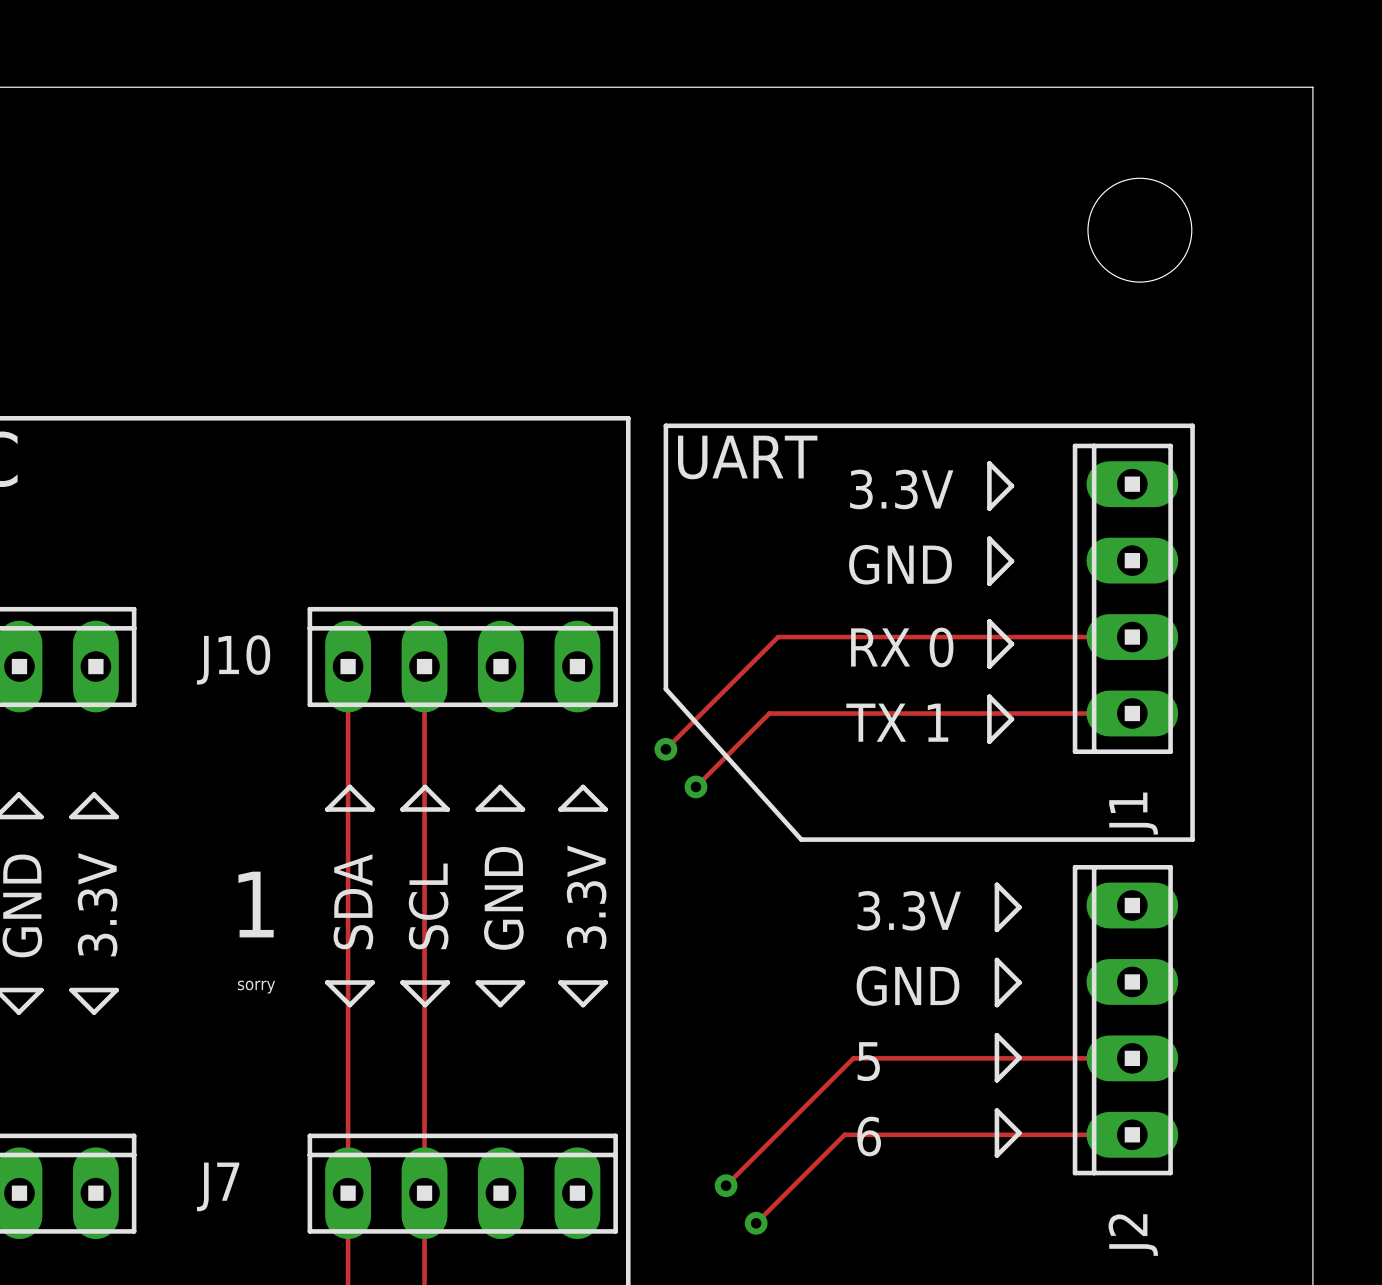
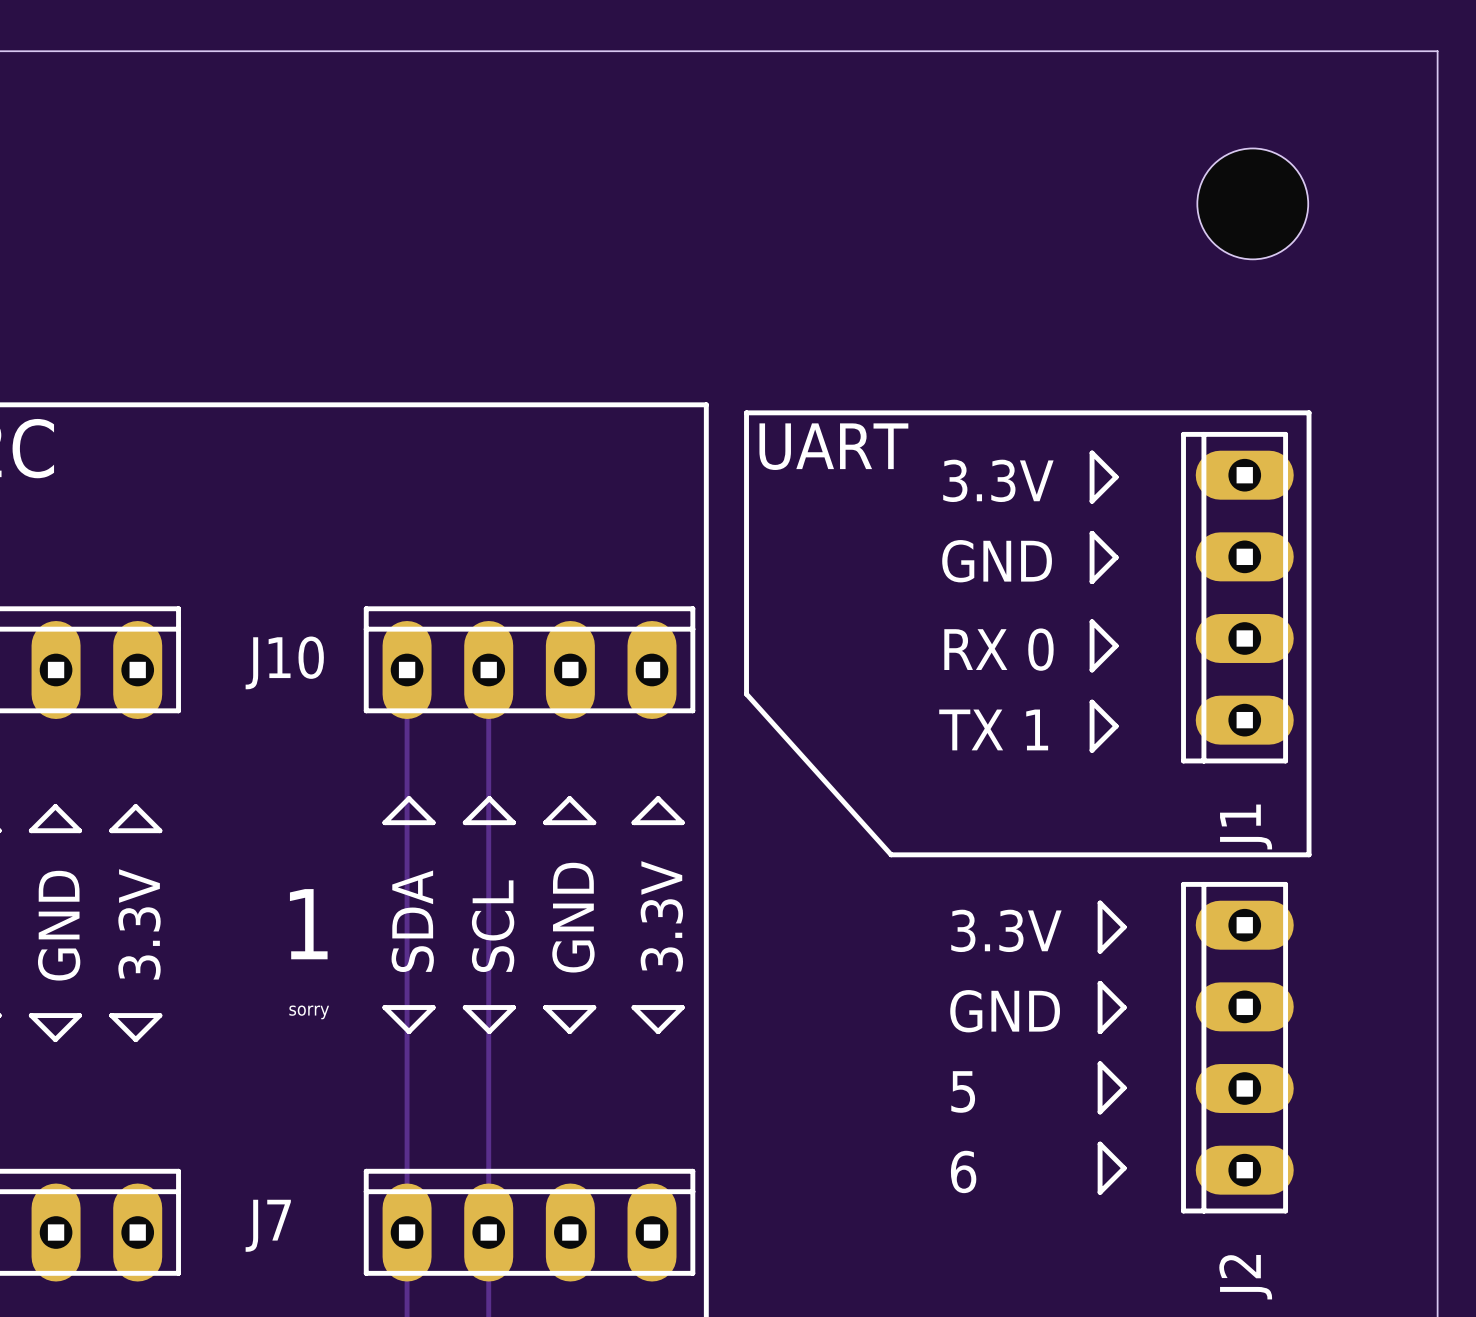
track: (1132, 637) (778, 637) (665, 749) -> none
track: (1132, 713) (769, 713) (695, 786) -> none
via: (665, 749) -> none
via: (695, 786) -> none
track: (1132, 1058) (853, 1058) (726, 1185) -> none
track: (1132, 1134) (844, 1134) (756, 1223) -> none
via: (726, 1185) -> none
via: (756, 1223) -> none

